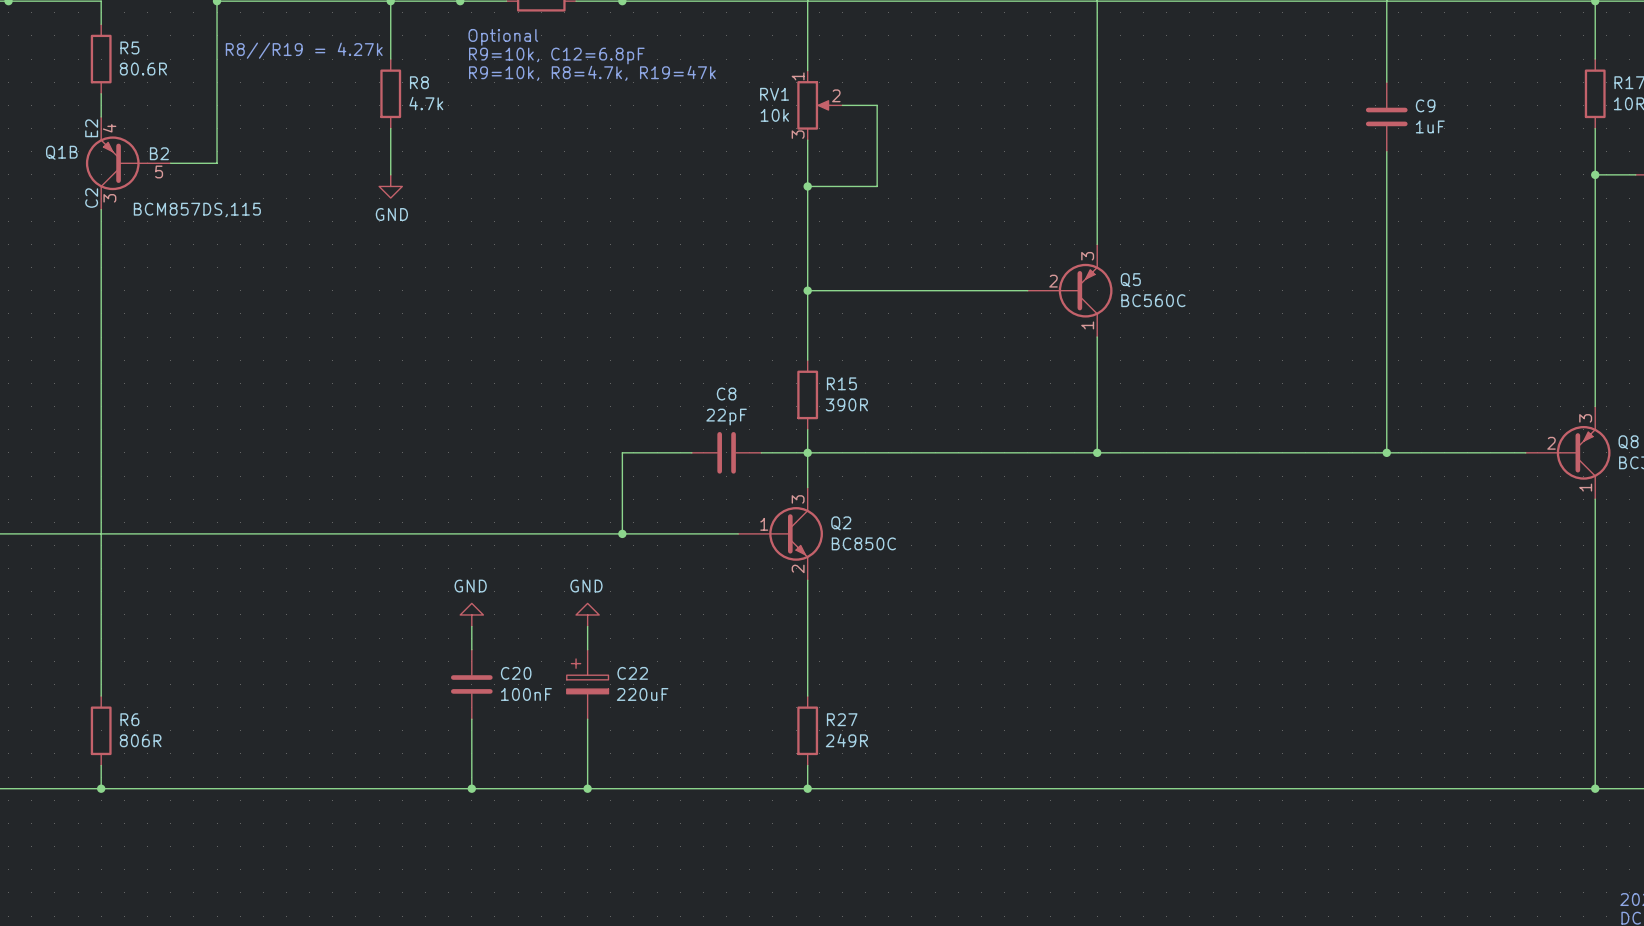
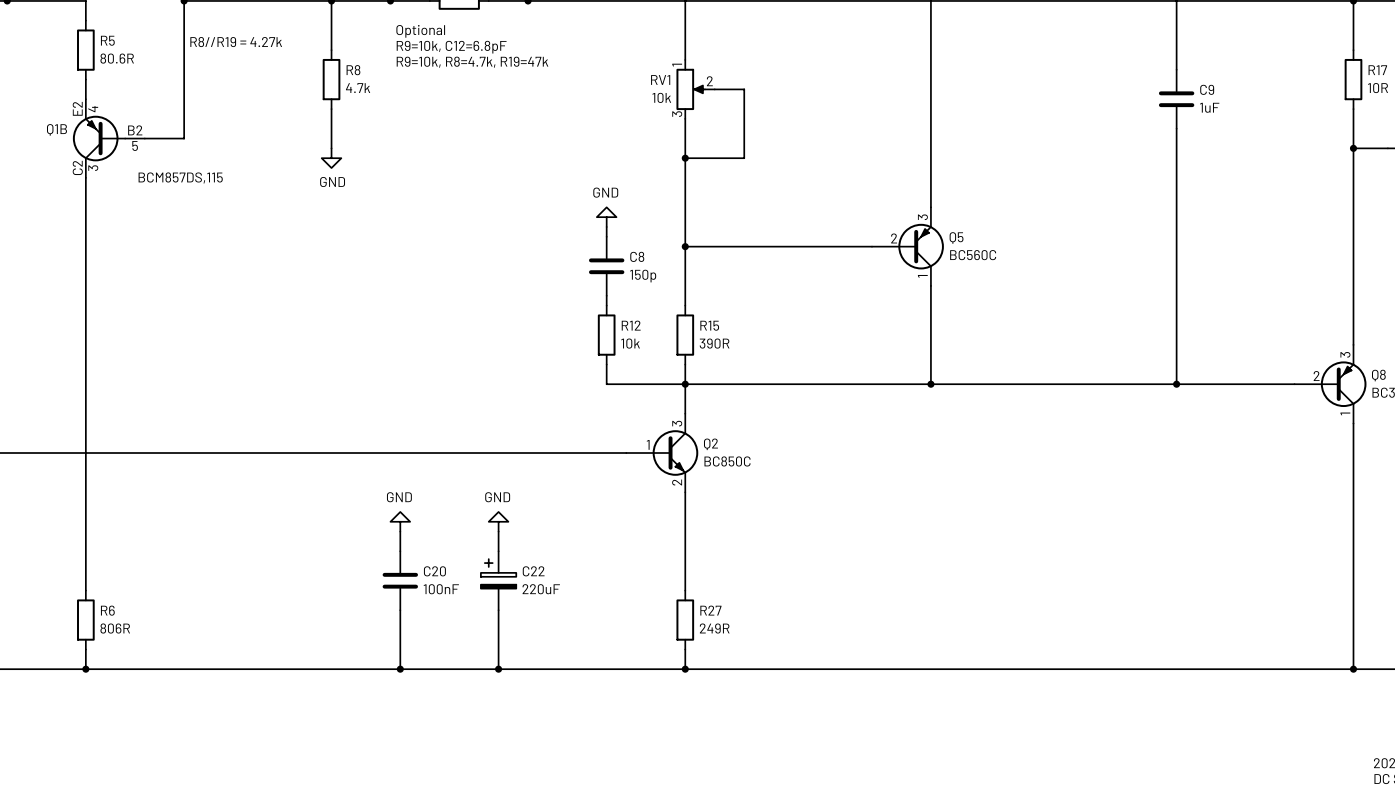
power symbol: none -> GND (606, 217)
wire: none -> (606, 226) (606, 236)
wire: none -> (606, 295) (606, 305)
R12: none -> 10k (606, 335)
C8 name position: C8 (726, 394) -> C8 (637, 256)
C8 value: 22pF (726, 417) -> 150p (643, 276)
wire: none -> (606, 364) (606, 384) (645, 384)
wire: (691, 452) (622, 452) (622, 533) -> none
C8 rotation: 0° (726, 452) -> 90° clockwise (606, 266)
C8 position: (726, 452) -> (606, 266)
junction: (622, 533) -> none

